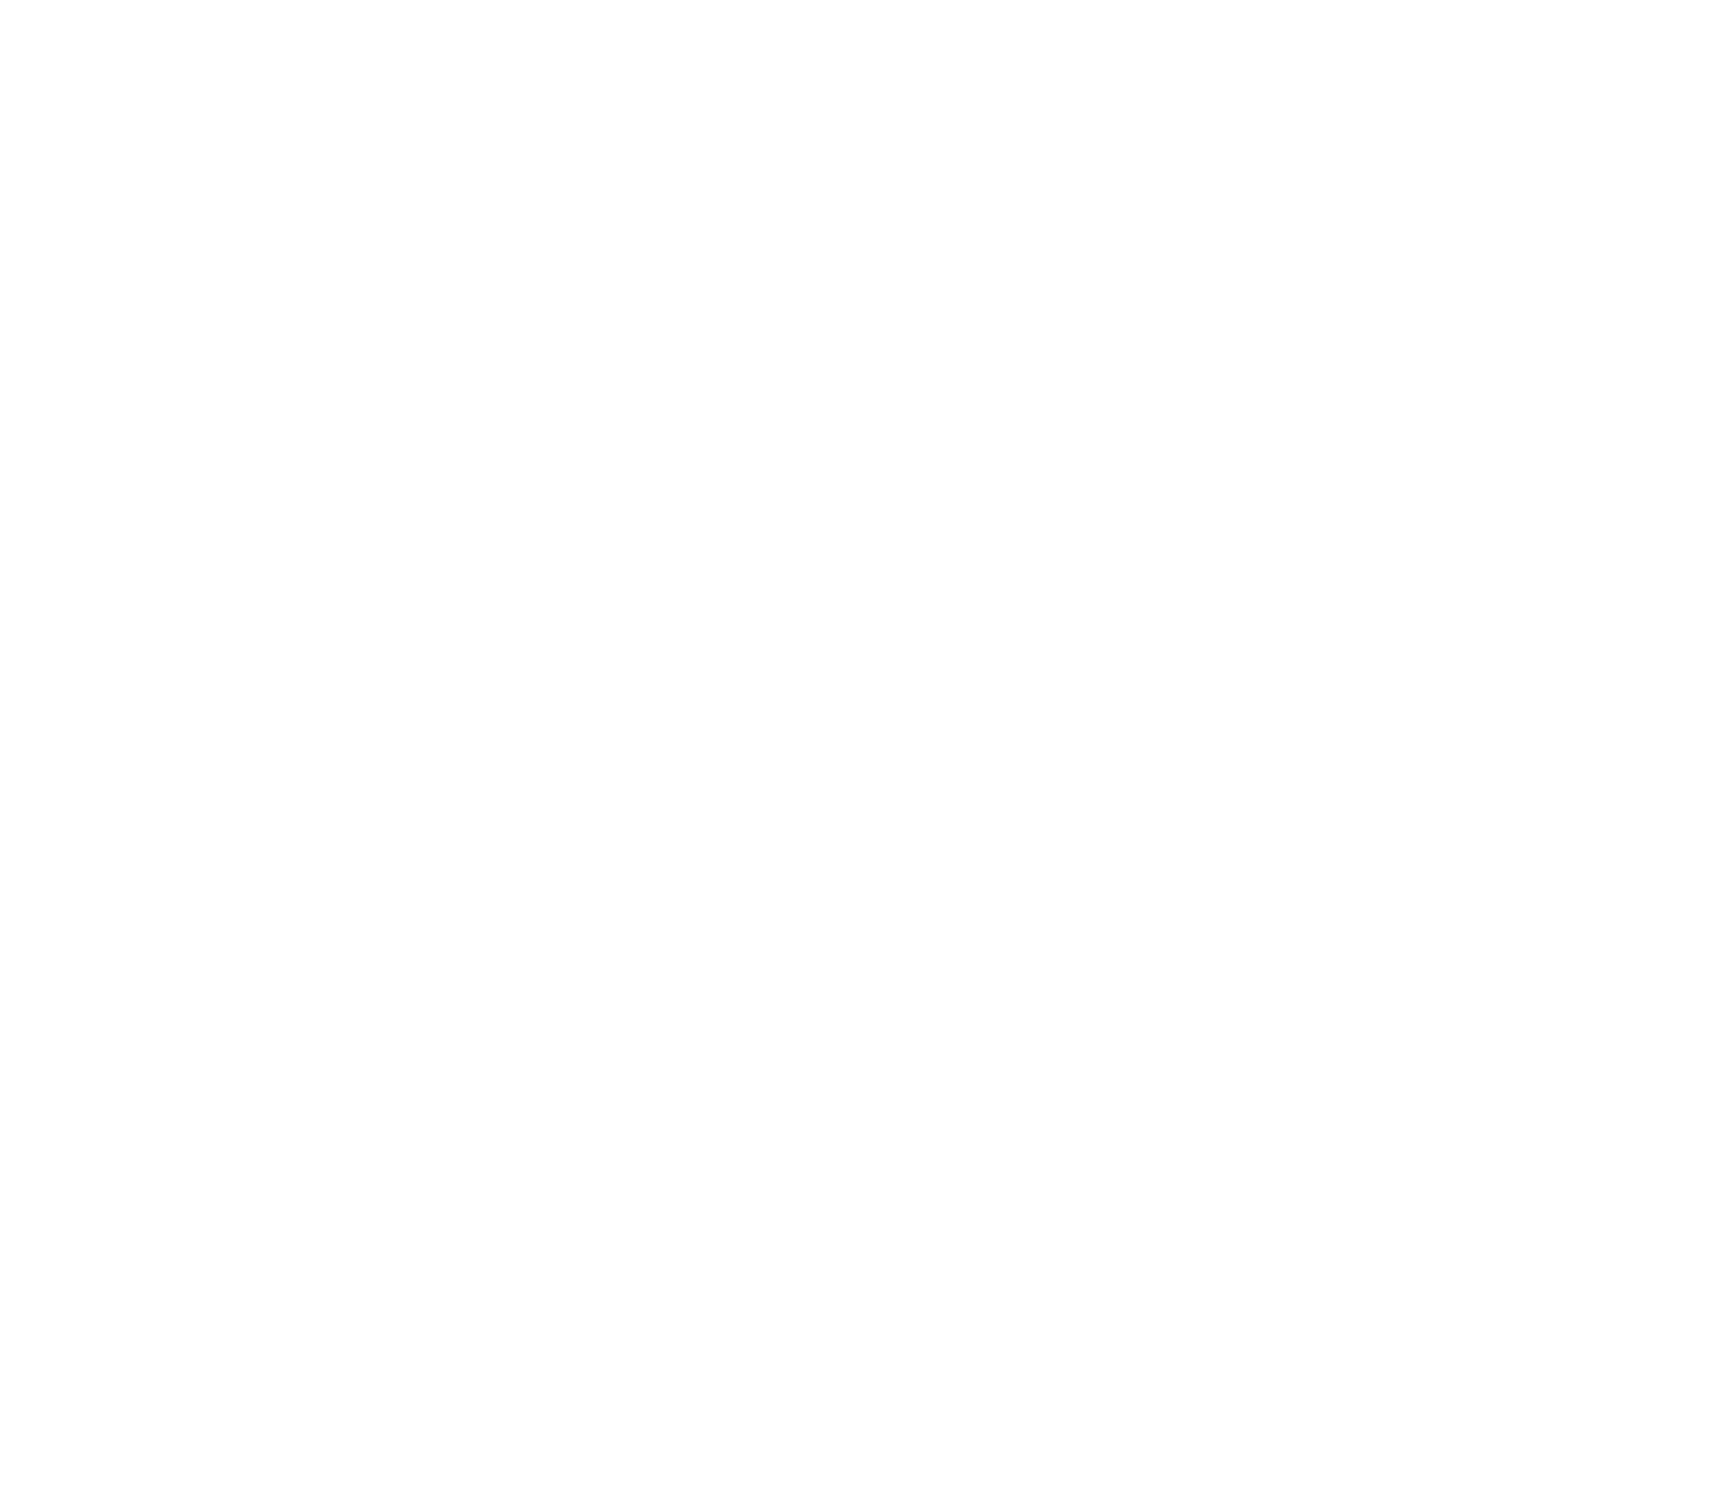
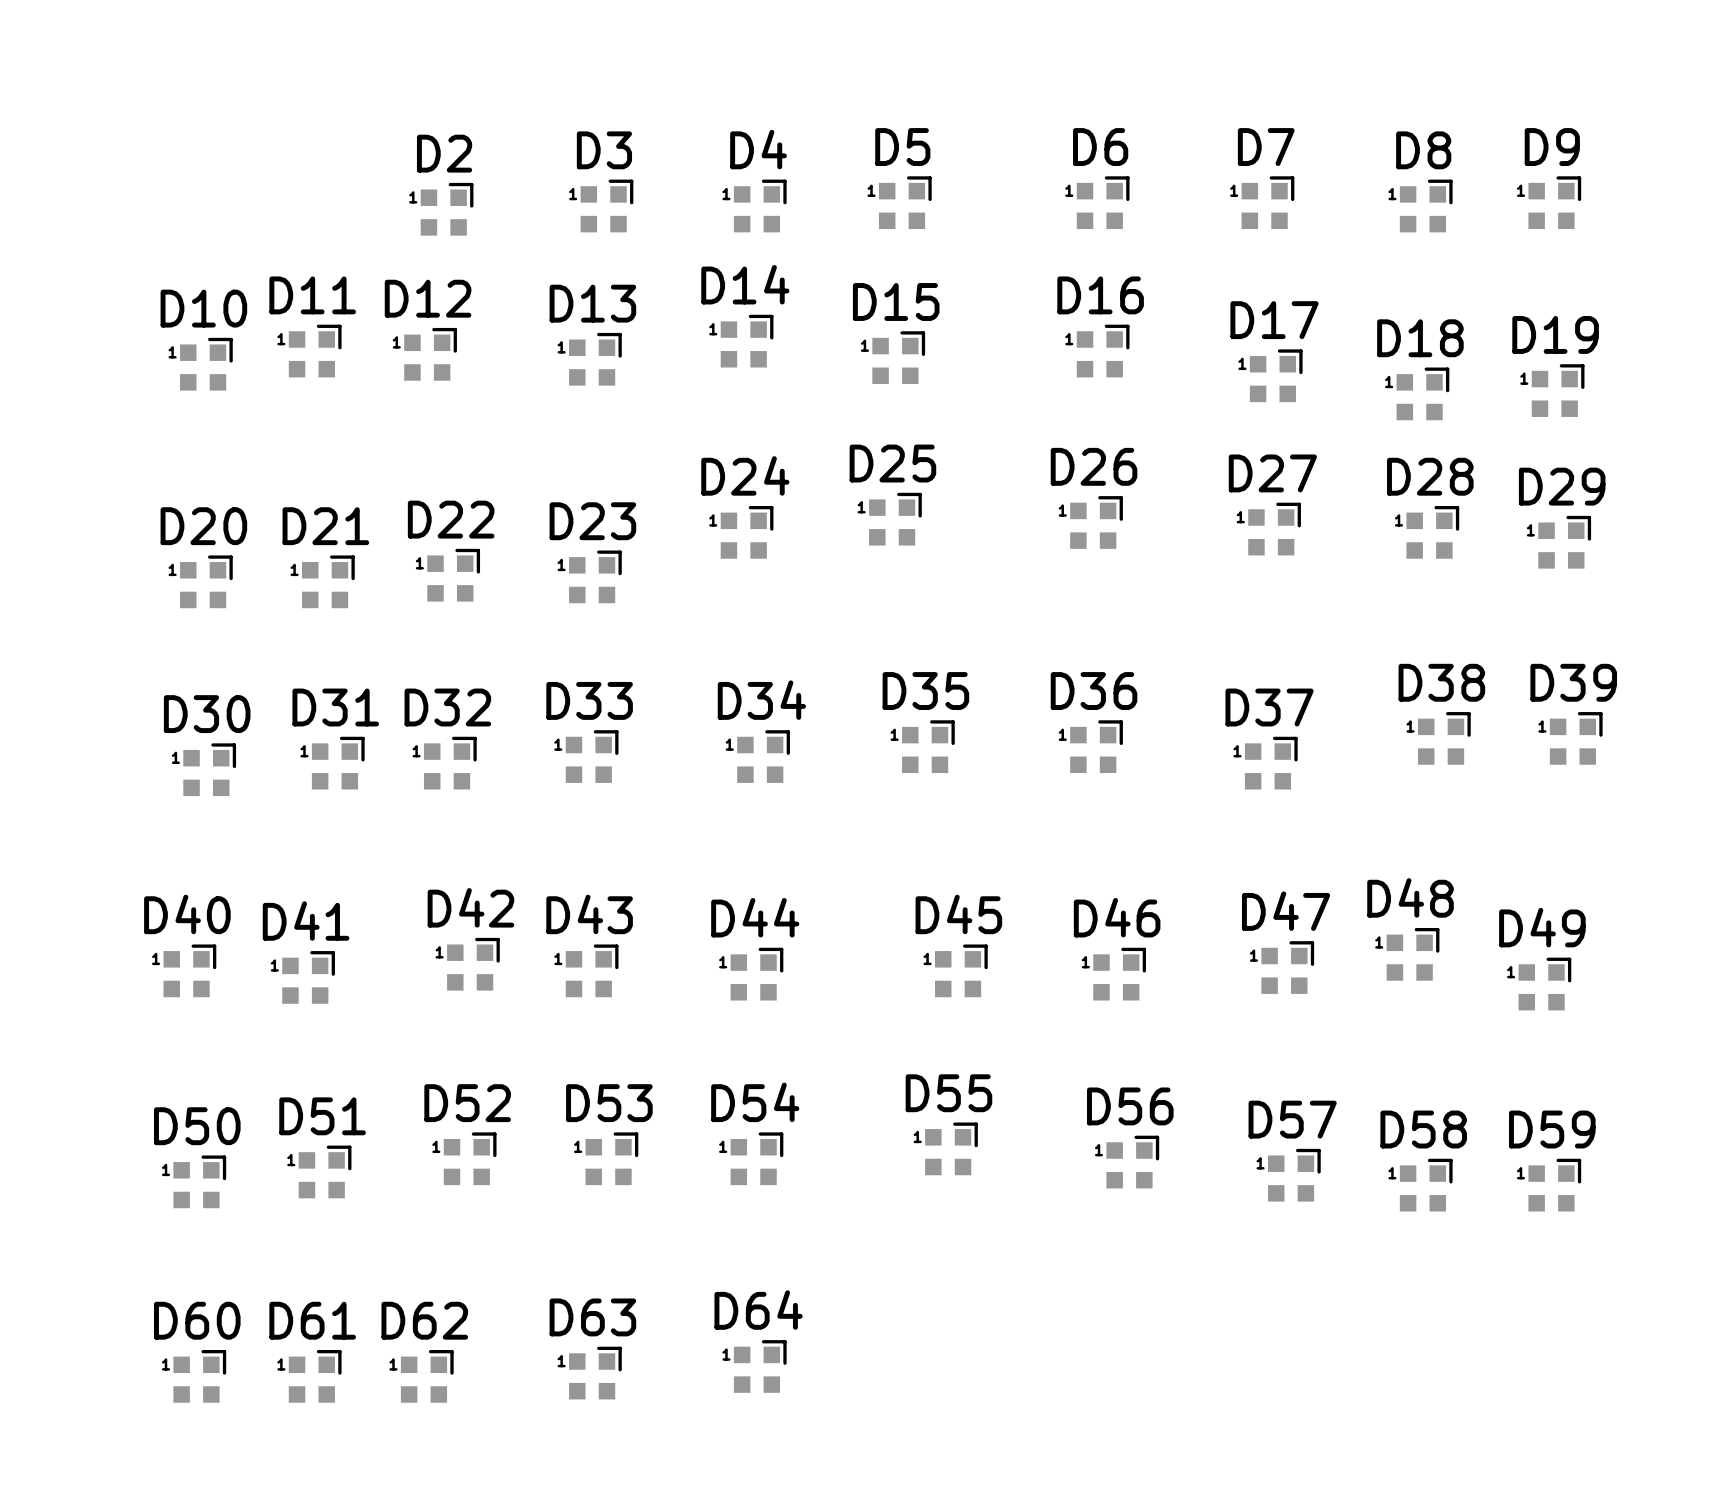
D5: none -> (905, 202)
D6: none -> (1103, 202)
D7: none -> (1267, 202)
D9: none -> (1554, 202)
D3: none -> (606, 205)
D4: none -> (760, 205)
D8: none -> (1426, 205)
D2: none -> (447, 209)
D14: none -> (747, 341)
D11: none -> (315, 351)
D16: none -> (1103, 351)
D12: none -> (430, 354)
D15: none -> (898, 357)
D13: none -> (595, 359)
D10: none -> (206, 364)
D17: none -> (1276, 375)
D19: none -> (1558, 390)
D18: none -> (1422, 393)
D25: none -> (895, 519)
D26: none -> (1096, 522)
D27: none -> (1274, 529)
D24: none -> (747, 532)
D28: none -> (1432, 532)
D29: none -> (1564, 542)
D22: none -> (453, 575)
D23: none -> (595, 576)
D20: none -> (206, 581)
D21: none -> (328, 581)
D38: none -> (1444, 738)
D39: none -> (1576, 738)
D35: none -> (928, 746)
D36: none -> (1096, 746)
D33: none -> (592, 756)
D34: none -> (763, 756)
D31: none -> (338, 763)
D32: none -> (450, 763)
D37: none -> (1271, 763)
D30: none -> (209, 769)
D48: none -> (1413, 954)
D42: none -> (473, 964)
D47: none -> (1287, 967)
D40: none -> (189, 970)
D43: none -> (592, 970)
D45: none -> (961, 970)
D44: none -> (756, 974)
D46: none -> (1119, 974)
D41: none -> (308, 977)
D49: none -> (1544, 984)
D55: none -> (951, 1148)
D52: none -> (470, 1158)
D53: none -> (611, 1158)
D54: none -> (756, 1158)
D56: none -> (1132, 1162)
D51: none -> (325, 1171)
D57: none -> (1294, 1175)
D50: none -> (199, 1181)
D58: none -> (1426, 1185)
D59: none -> (1554, 1185)
D64: none -> (760, 1366)
D63: none -> (595, 1373)
D60: none -> (199, 1376)
D61: none -> (315, 1376)
D62: none -> (427, 1376)

